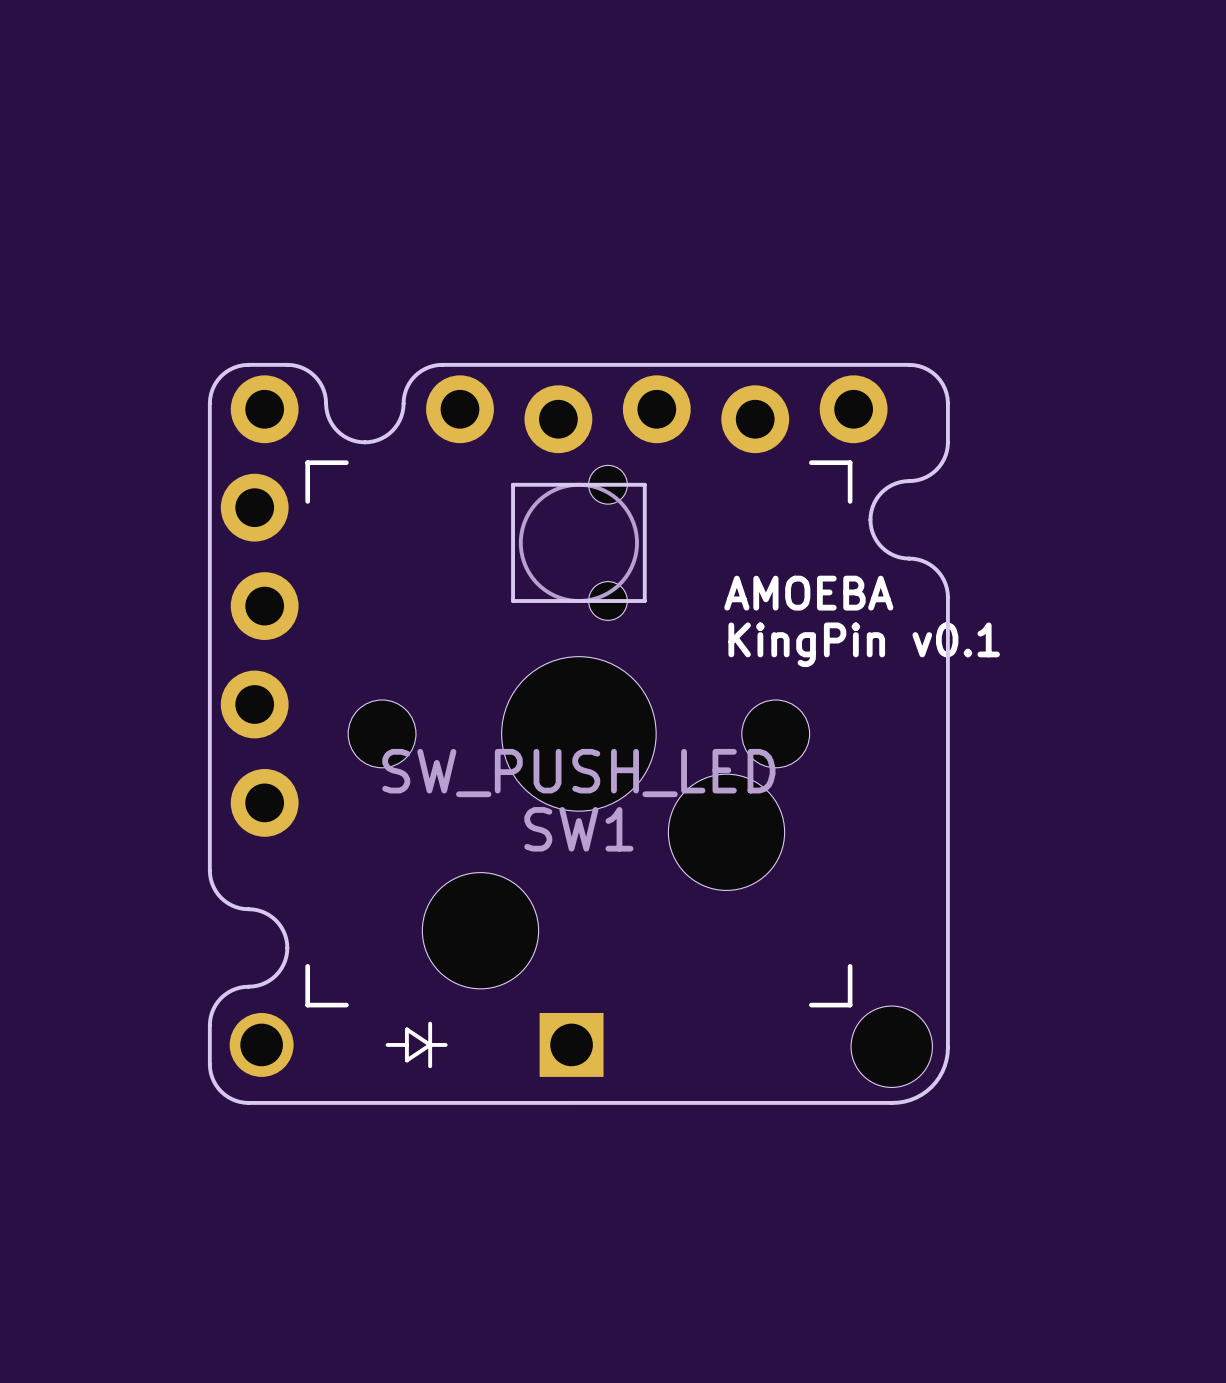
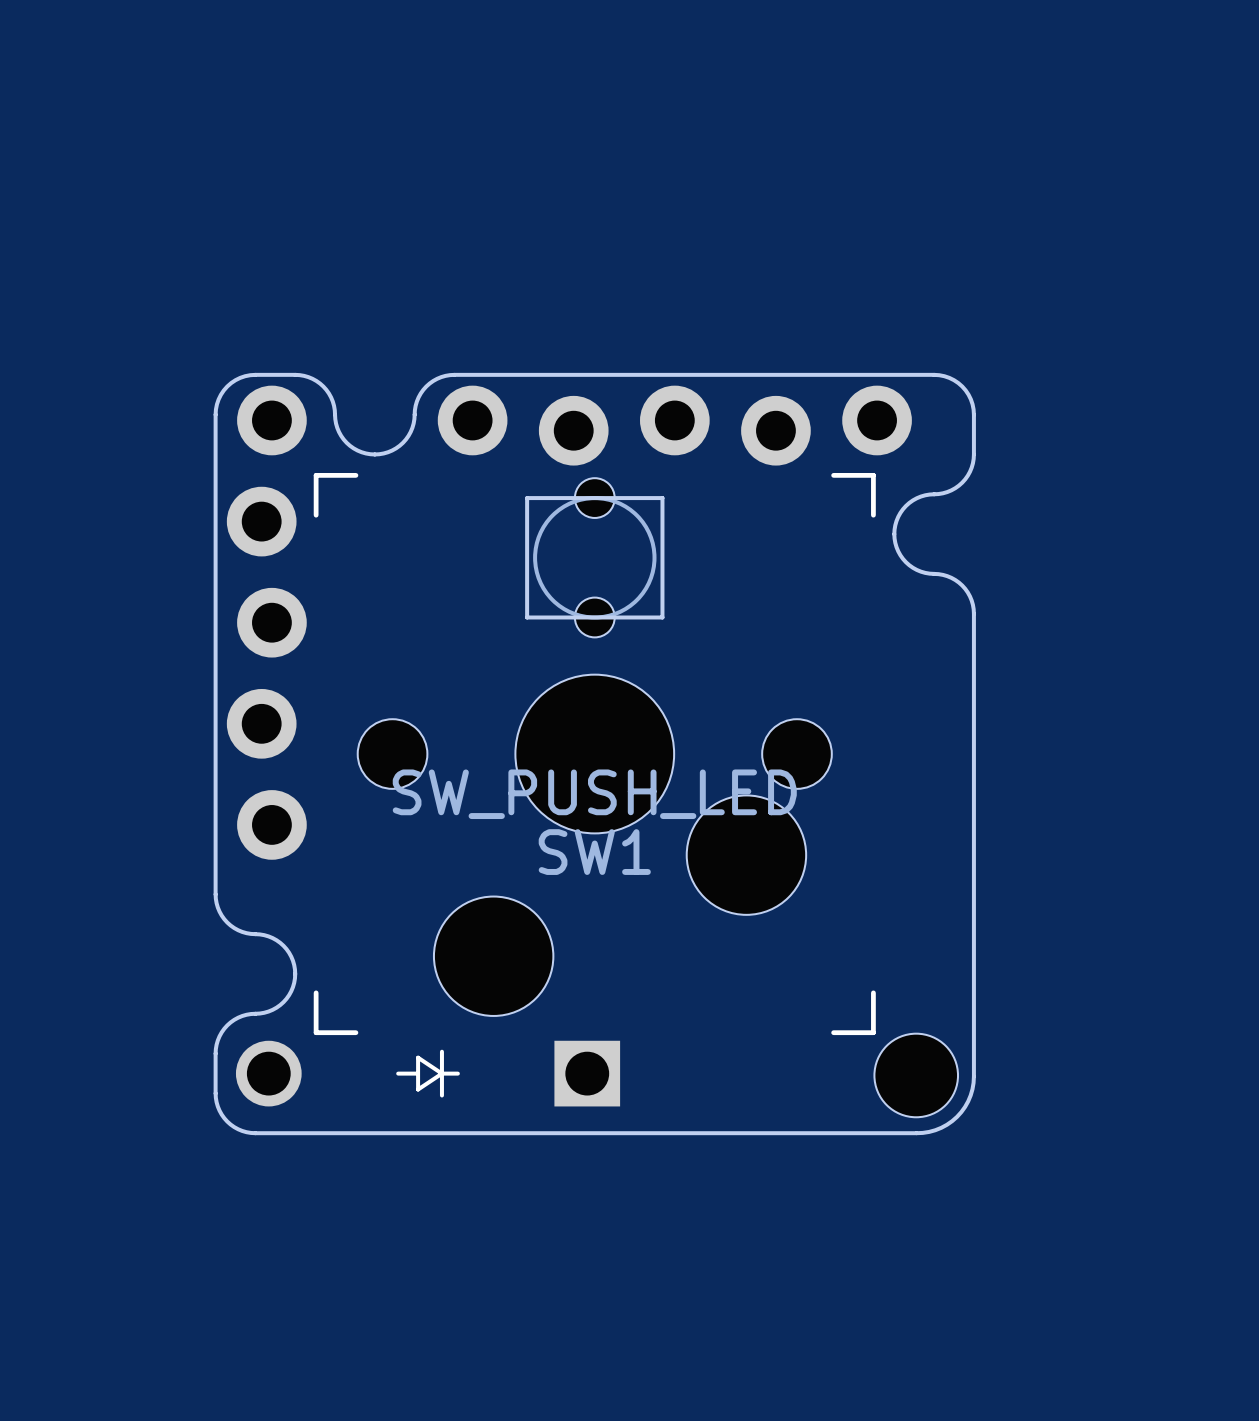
SW1 footprint: [305, 460, 853, 1008] -> [313, 472, 876, 1036]
text: AMOEBA (808, 593) -> none
text: KingPin v0.1 (864, 644) -> none

